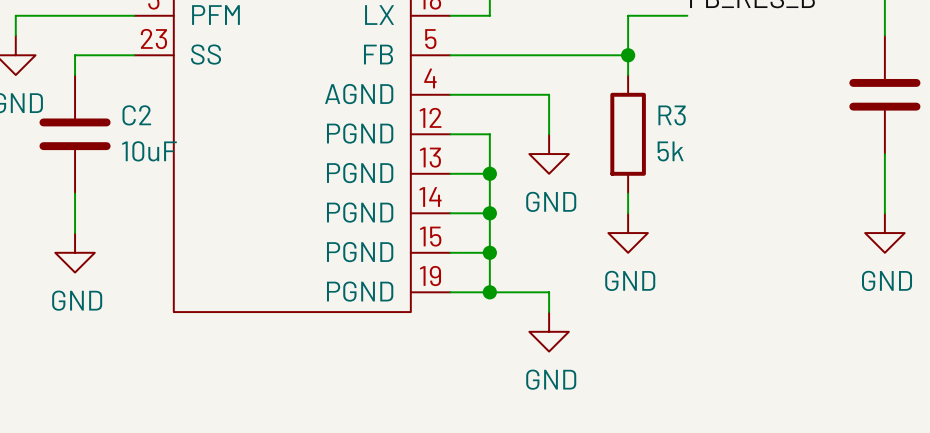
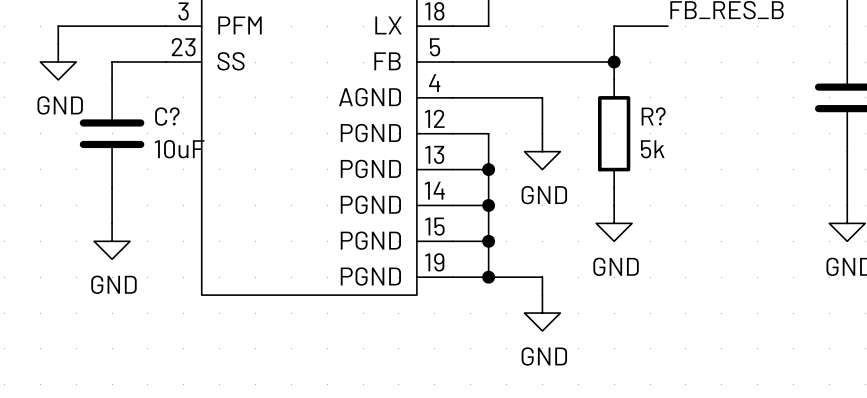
C2 name: C2 (136, 115) -> C? (167, 116)
R3 name: R3 (672, 115) -> R? (653, 116)

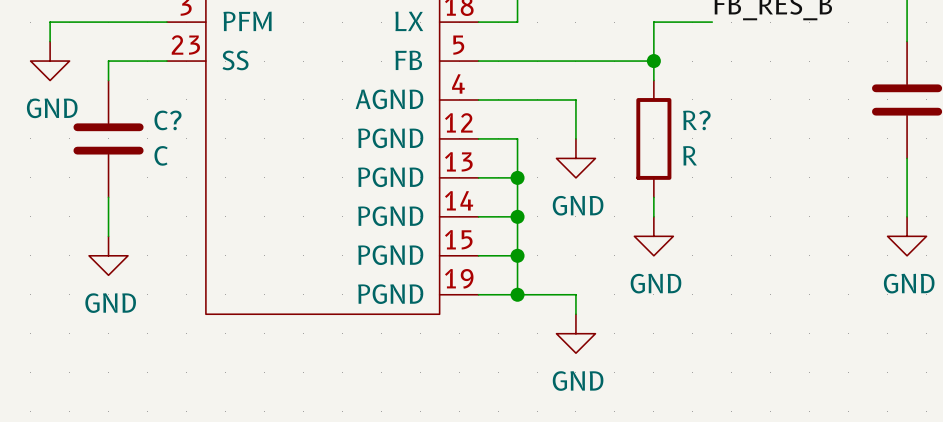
C? value: 10uF (179, 149) -> C (161, 155)
R? value: 5k (652, 149) -> R (690, 155)

